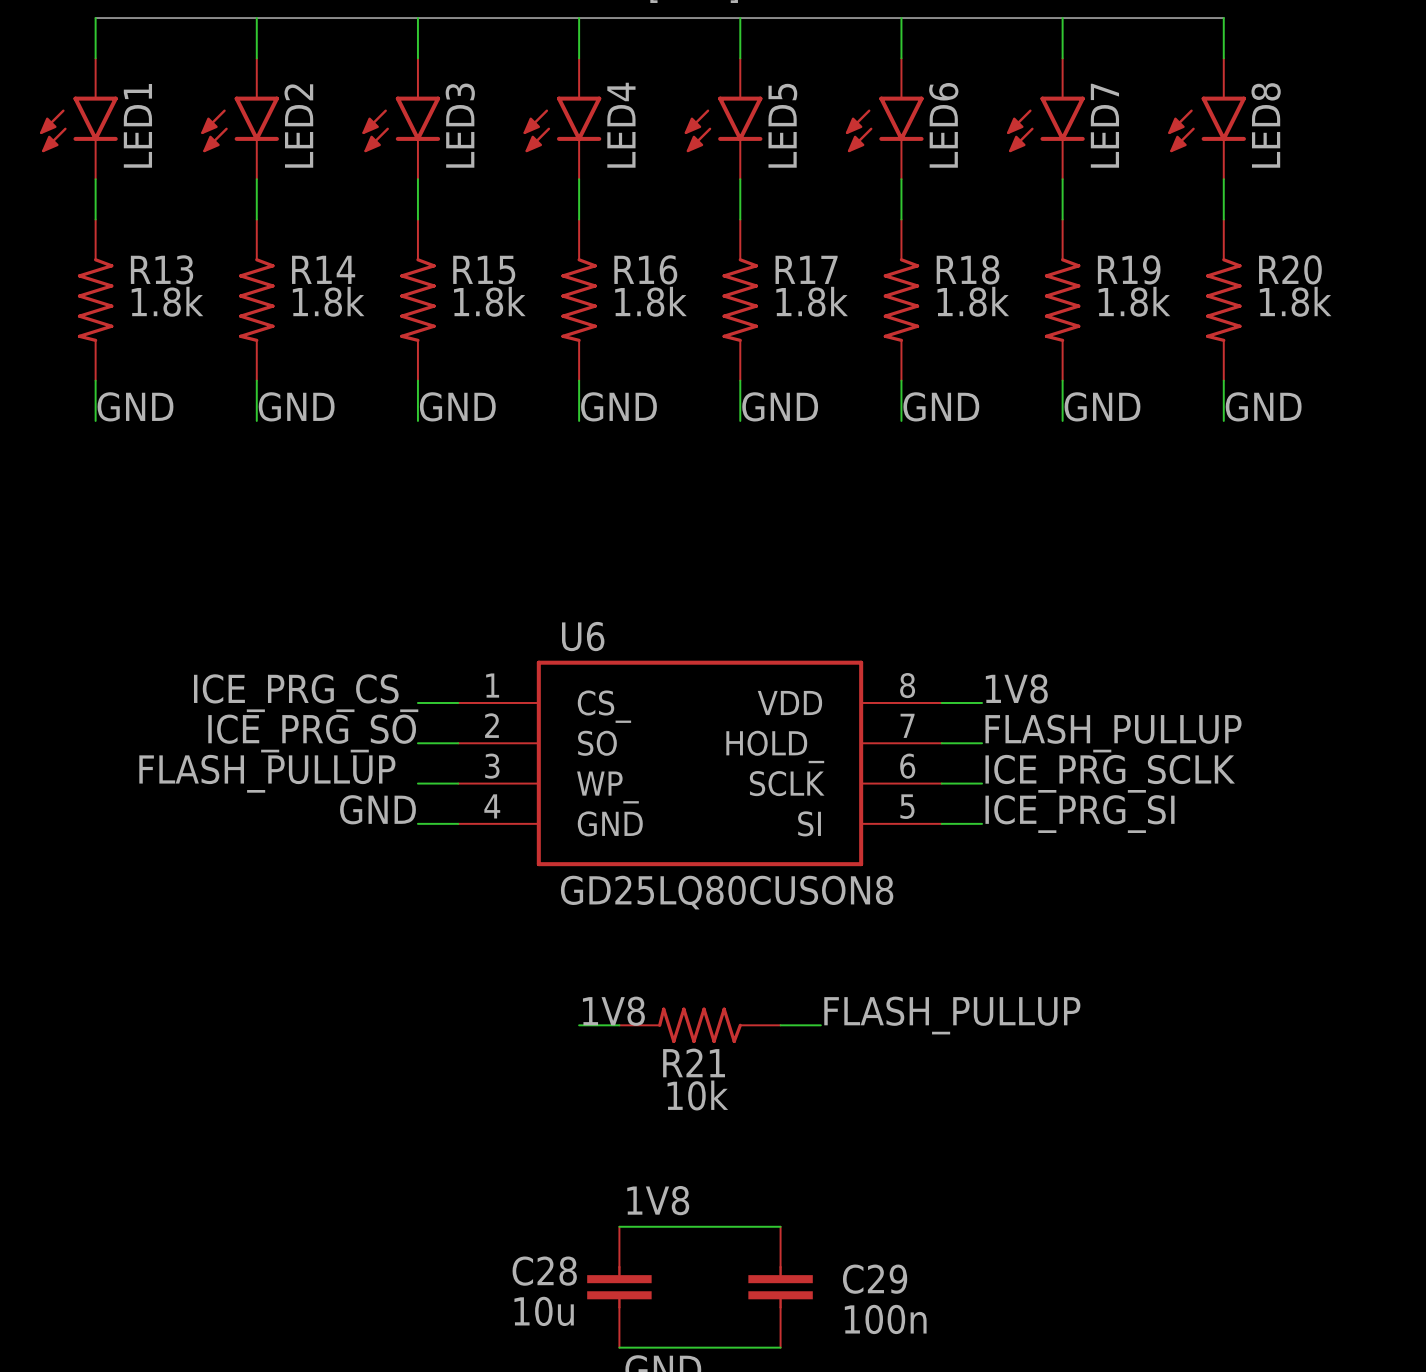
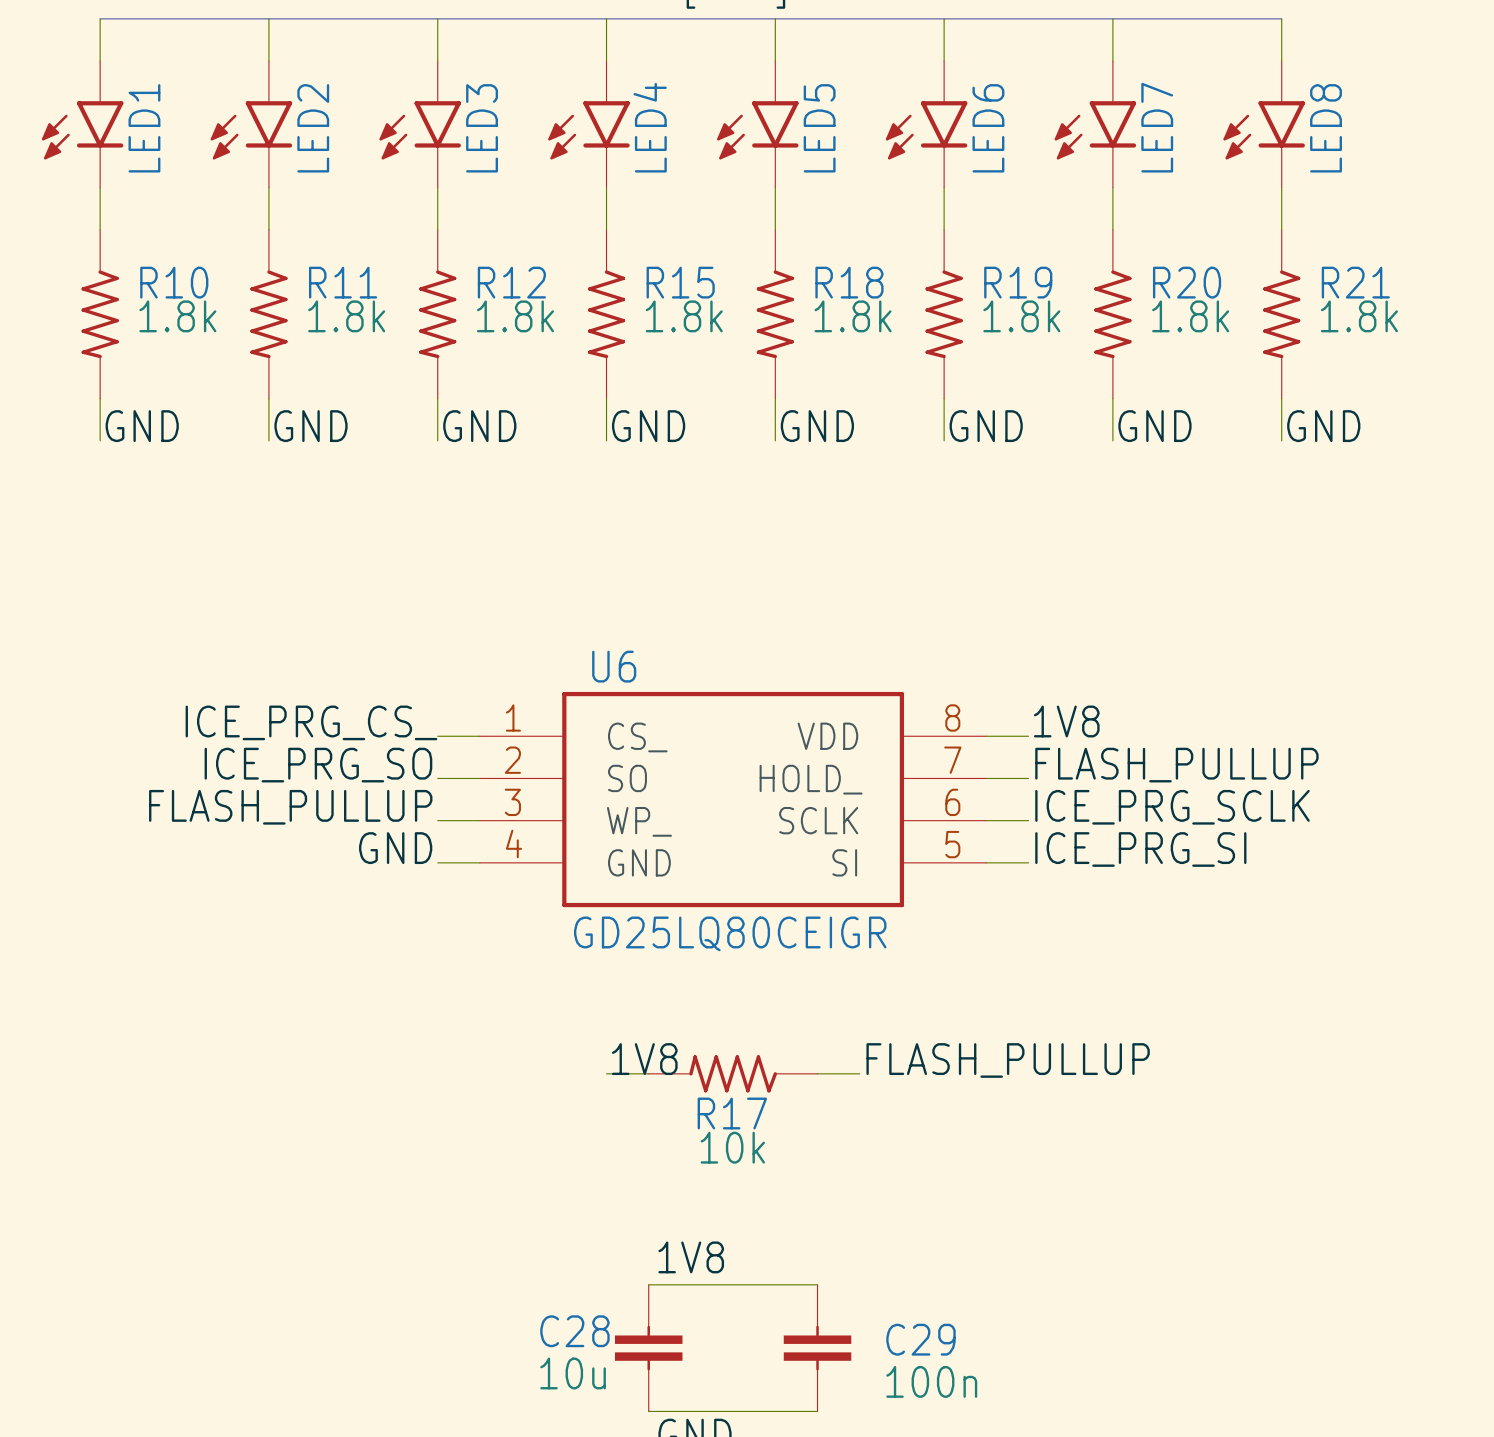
R13 name: R13 (162, 269) -> R10 (174, 282)
R14 name: R14 (323, 269) -> R11 (343, 282)
R16 name: R16 (645, 269) -> R15 (680, 282)
R17 name: R17 (806, 269) -> R18 (849, 282)
R18 name: R18 (968, 269) -> R19 (1018, 282)
R19 name: R19 (1129, 269) -> R20 (1187, 282)
R20 name: R20 (1290, 269) -> R21 (1355, 282)
R15 name: R15 (484, 270) -> R12 (511, 282)
U6 text: none -> GD25LQ80CEIGR (730, 933)
U6 value: GD25LQ80CUSON8 (727, 892) -> none
R21 name: R21 (694, 1062) -> R17 (732, 1113)

